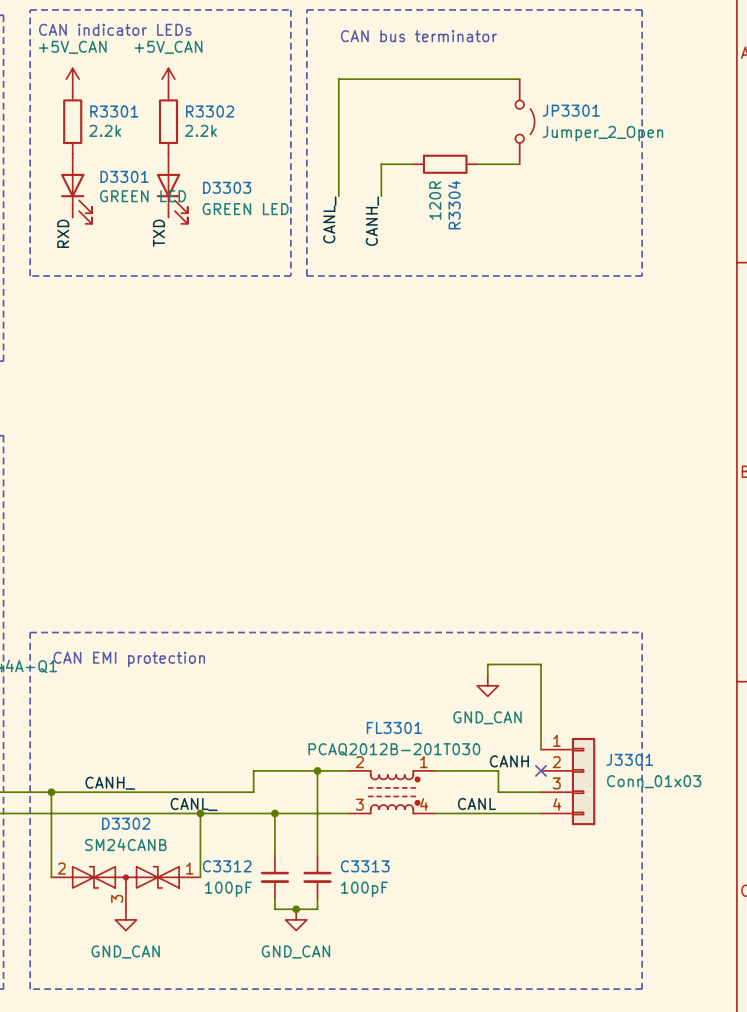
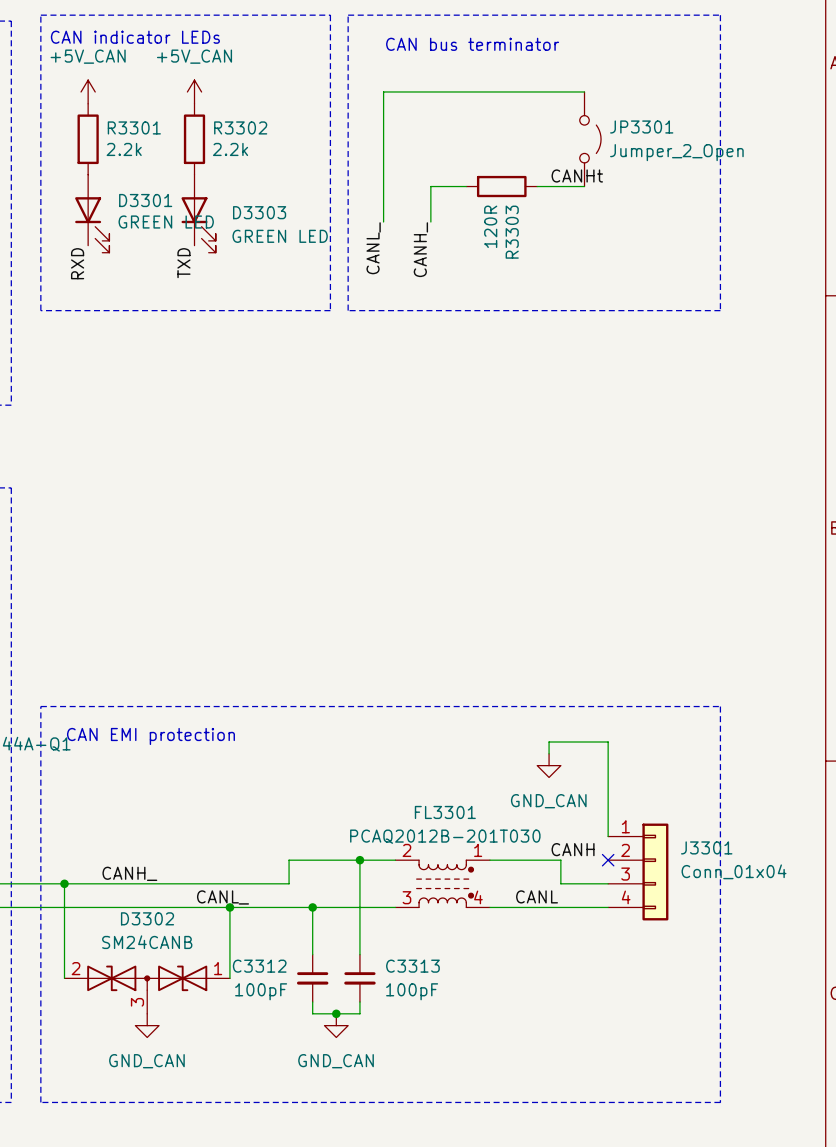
label: none -> CANHt (577, 175)
R3304 name: R3304 (454, 205) -> R3303 (512, 232)
J3301 value: Conn_01x03 (654, 781) -> Conn_01x04 (734, 871)

